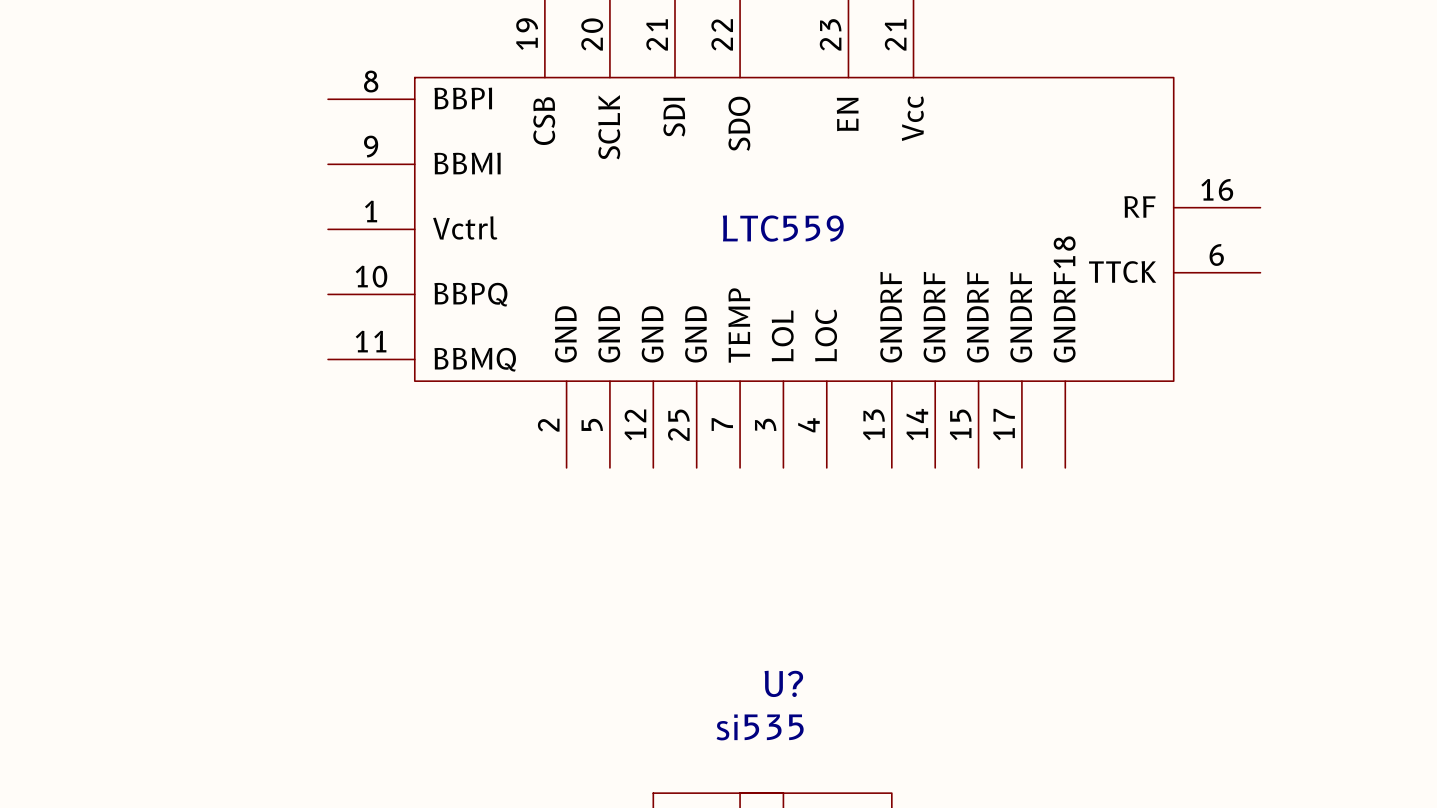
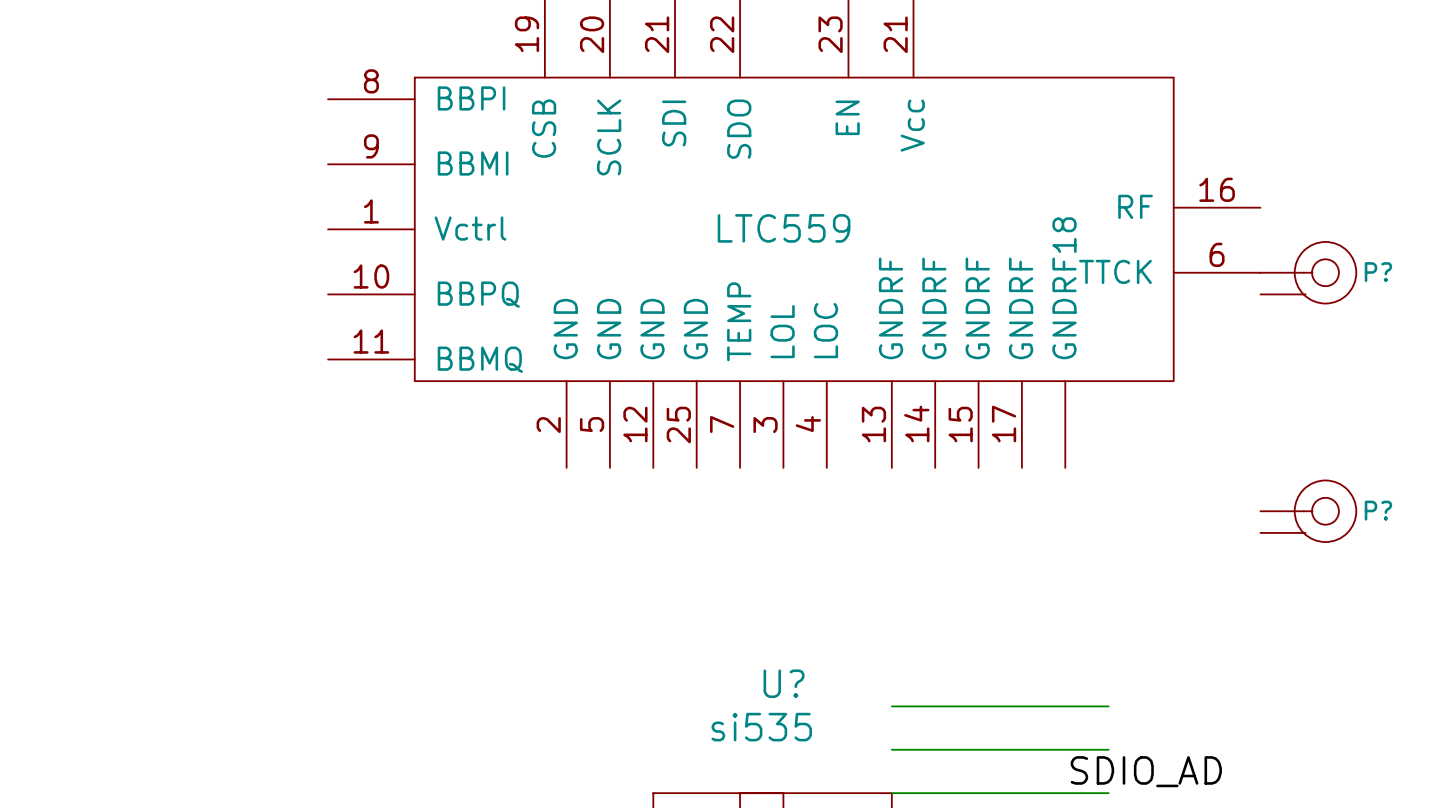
P?: none -> (1308, 272)
P?: none -> (1308, 511)
wire: none -> (891, 706) (1108, 706)
wire: none -> (891, 749) (1108, 749)
label: none -> SDIO_AD (1146, 771)
wire: none -> (891, 793) (1108, 793)

